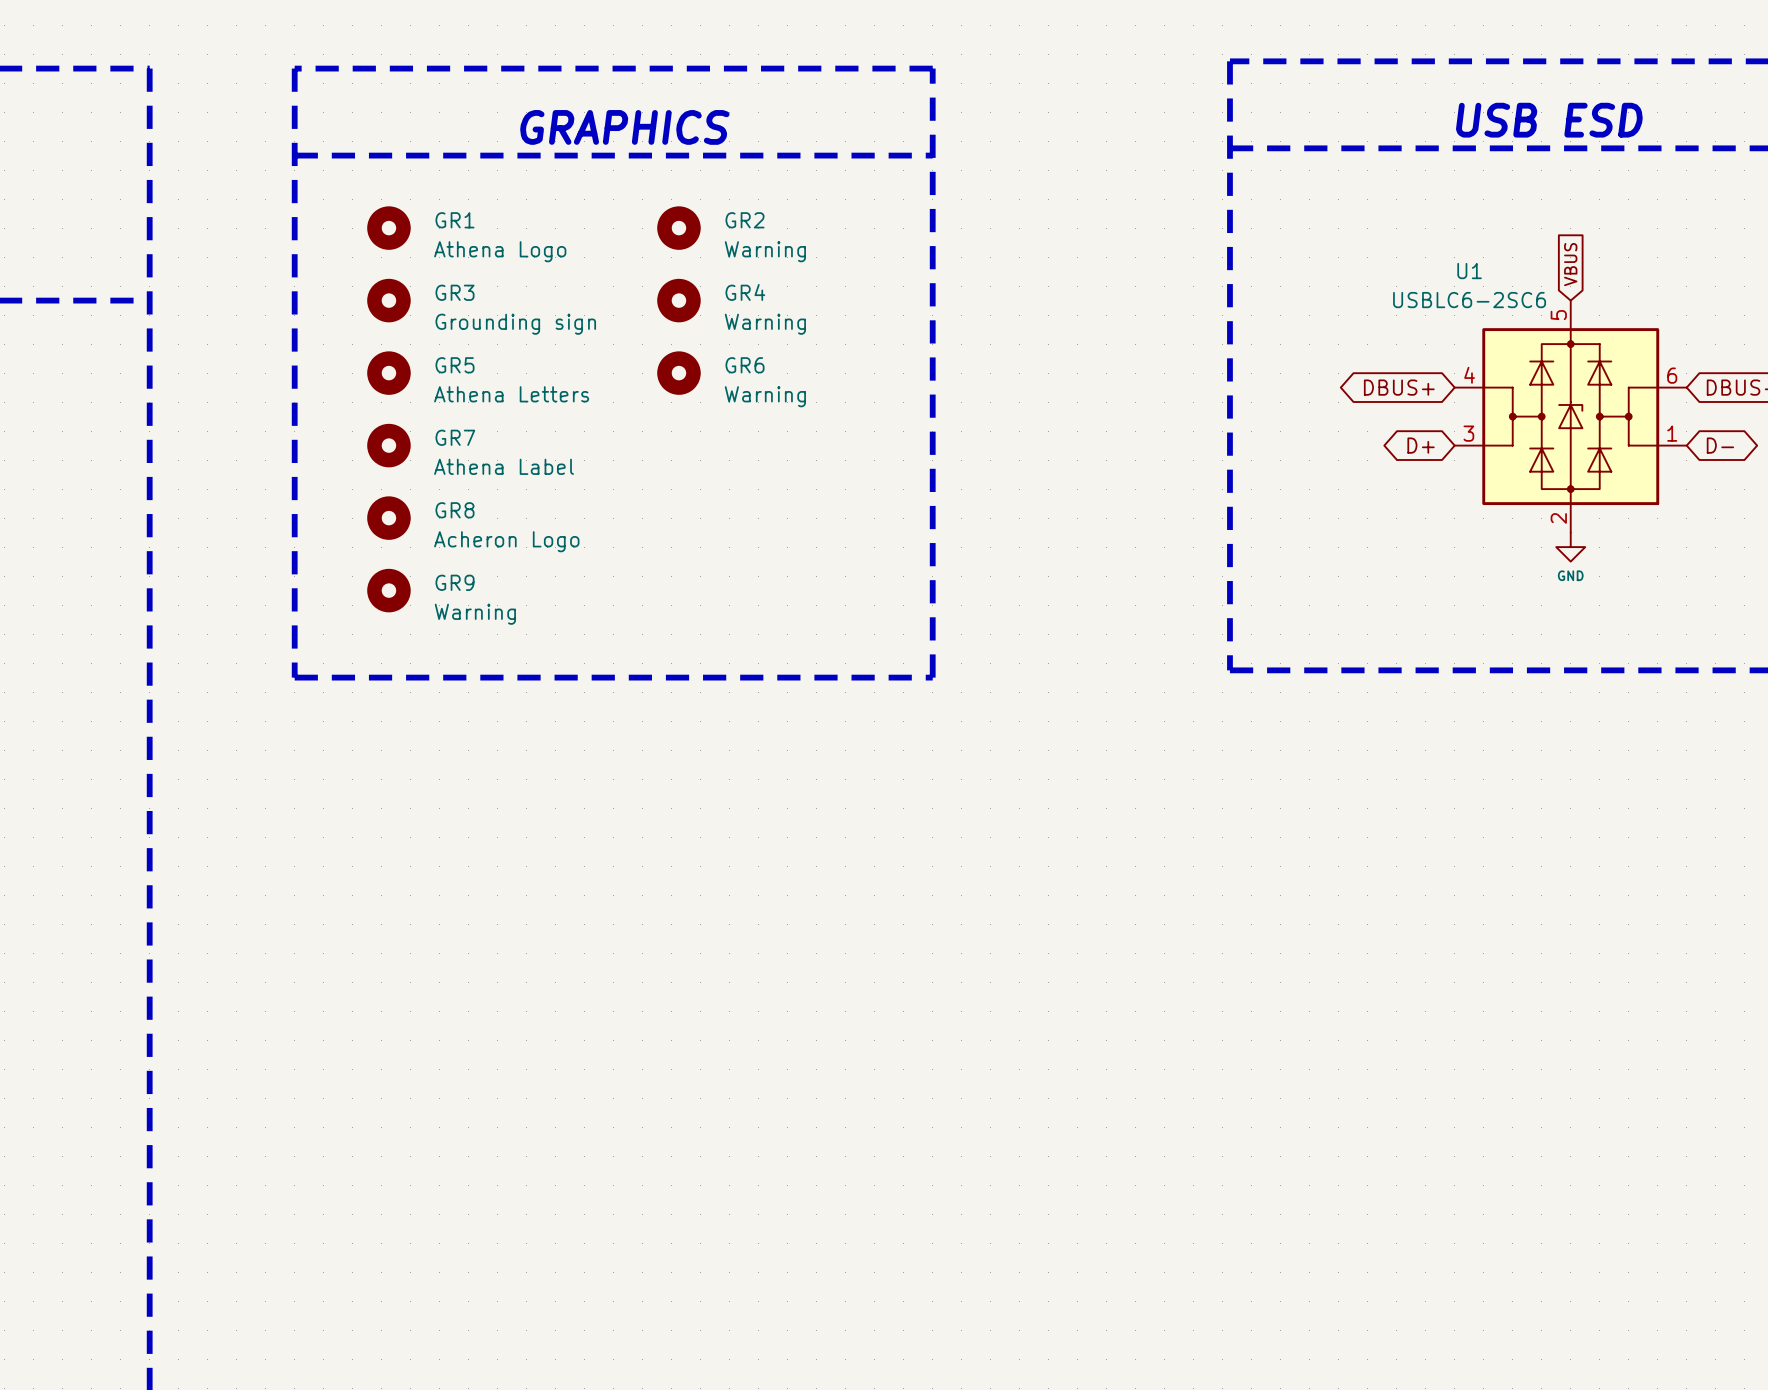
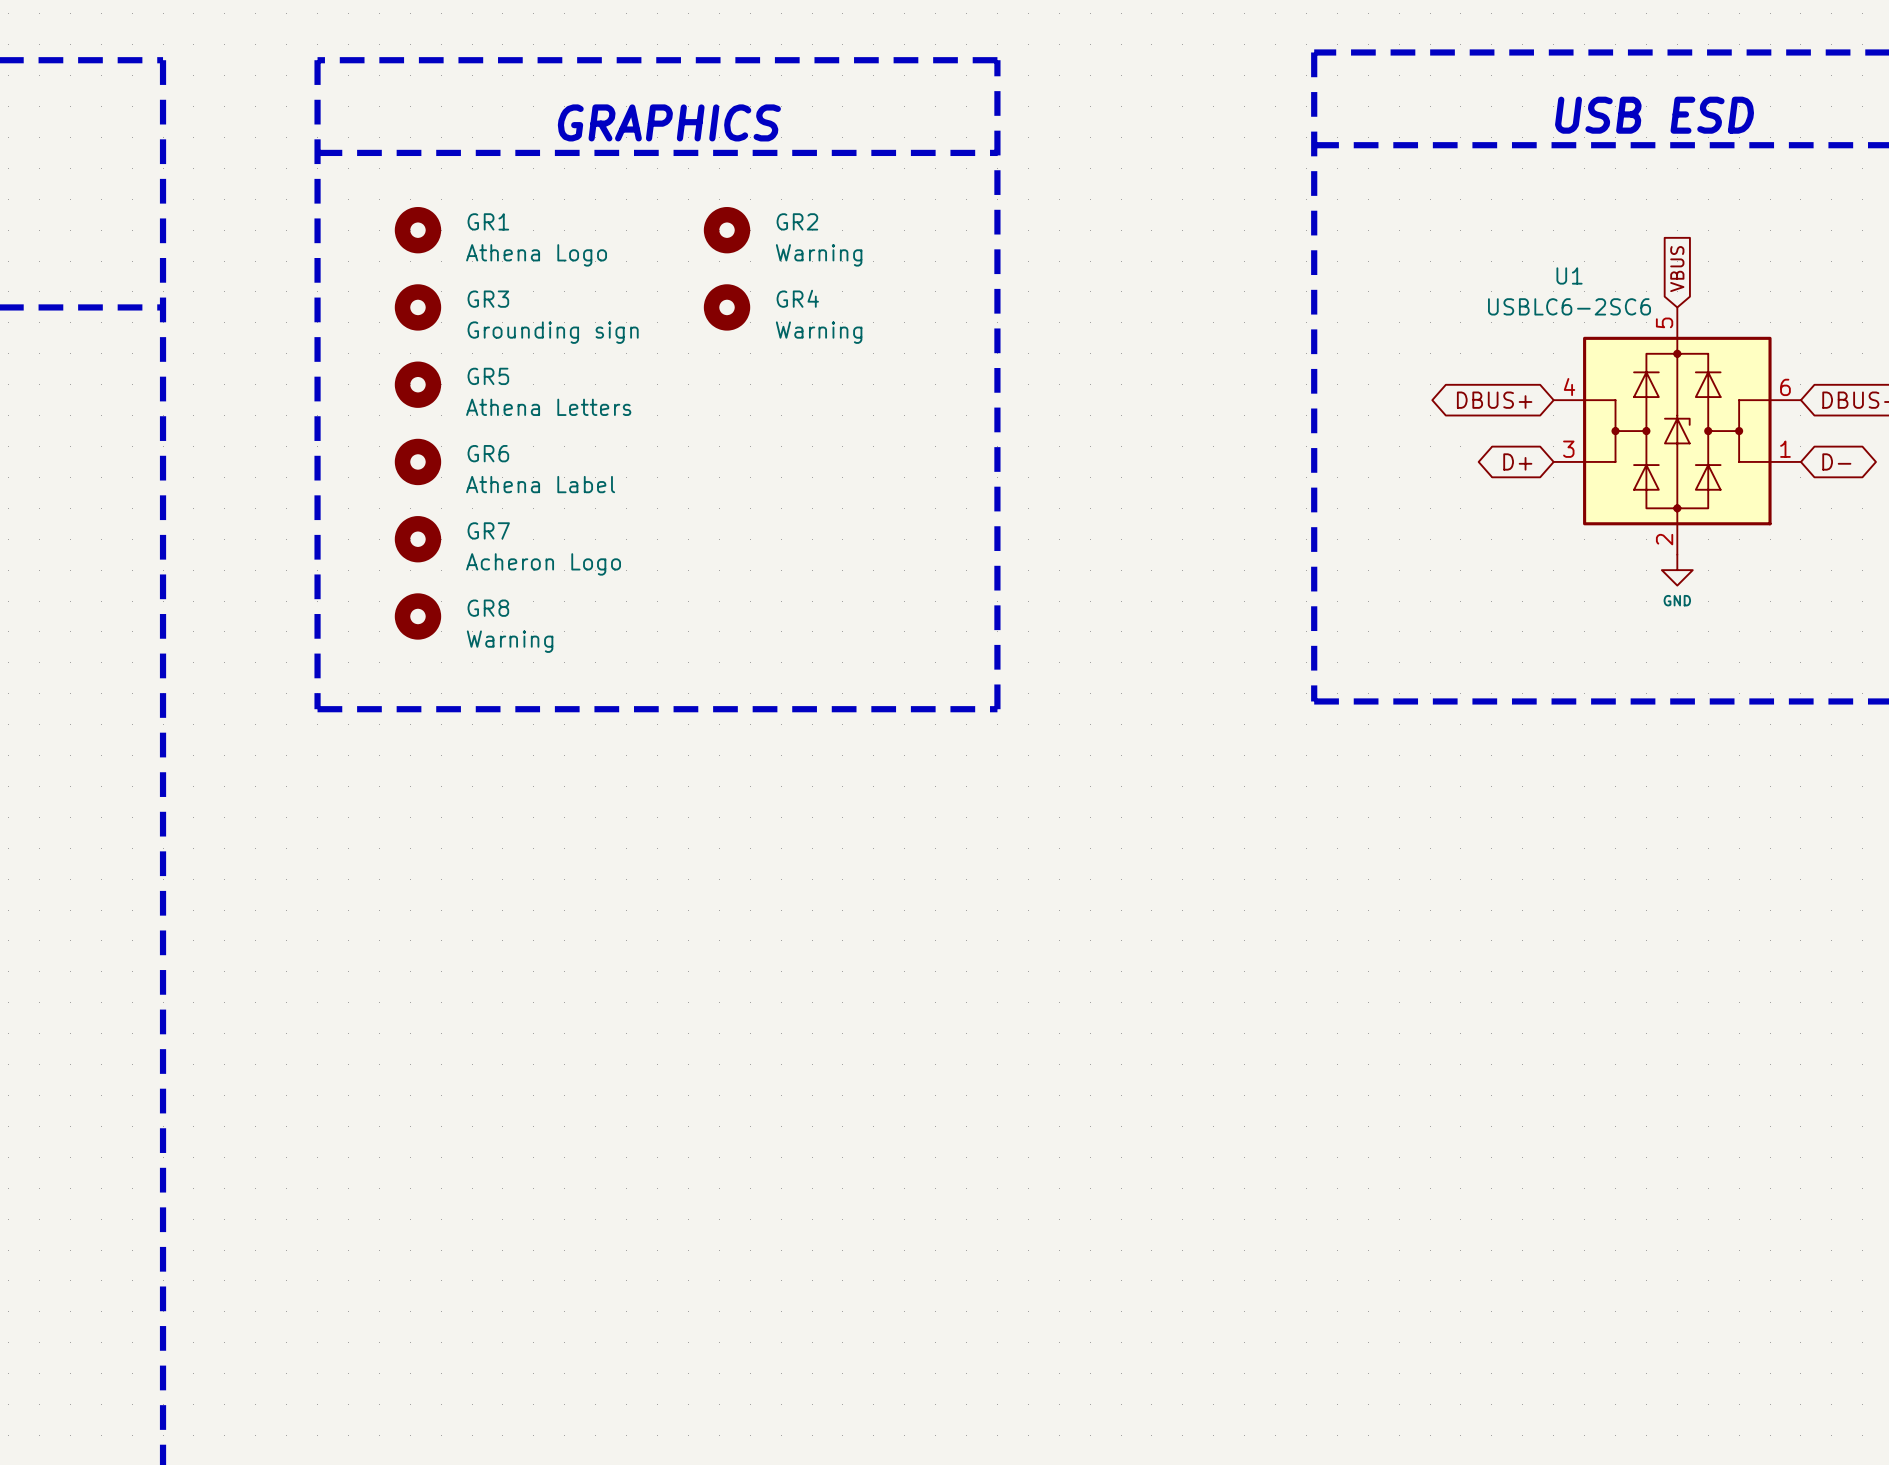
GR6: Warning (678, 373) -> none
GR7 name: GR7 (455, 437) -> GR6 (488, 453)
GR8 name: GR8 (455, 510) -> GR7 (488, 530)
GR9 name: GR9 (455, 582) -> GR8 (488, 608)

